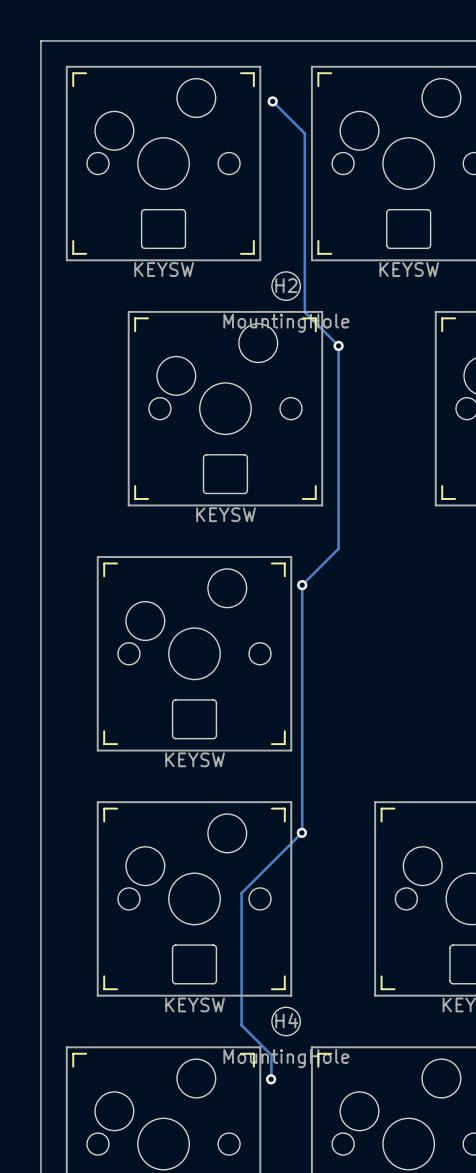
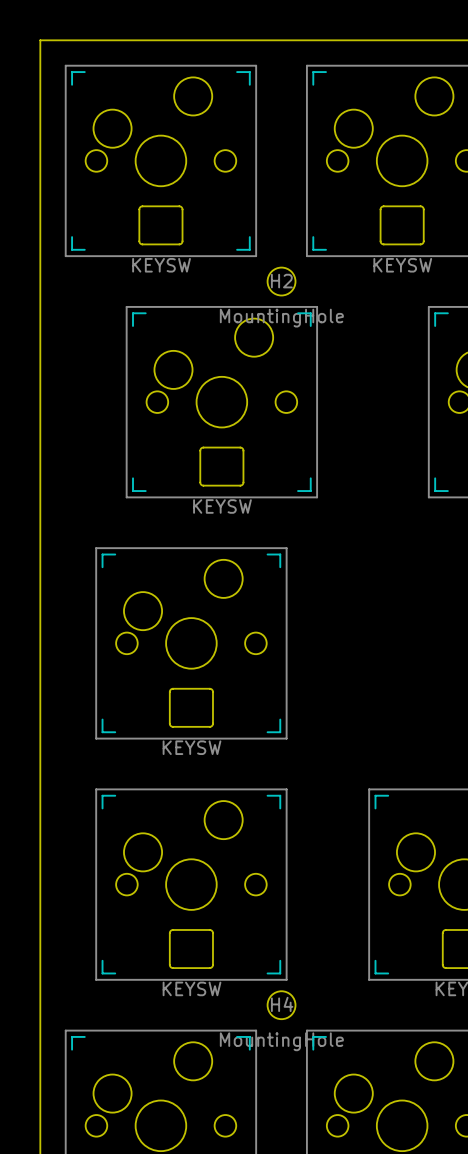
track: (272, 101) (304, 133) (304, 312) (338, 345) (338, 548) (302, 585) (302, 832) (241, 893) (241, 1025) (271, 1055) (271, 1079) -> none
via: (272, 101) -> none
via: (338, 345) -> none
via: (302, 585) -> none
via: (301, 832) -> none
via: (271, 1079) -> none

